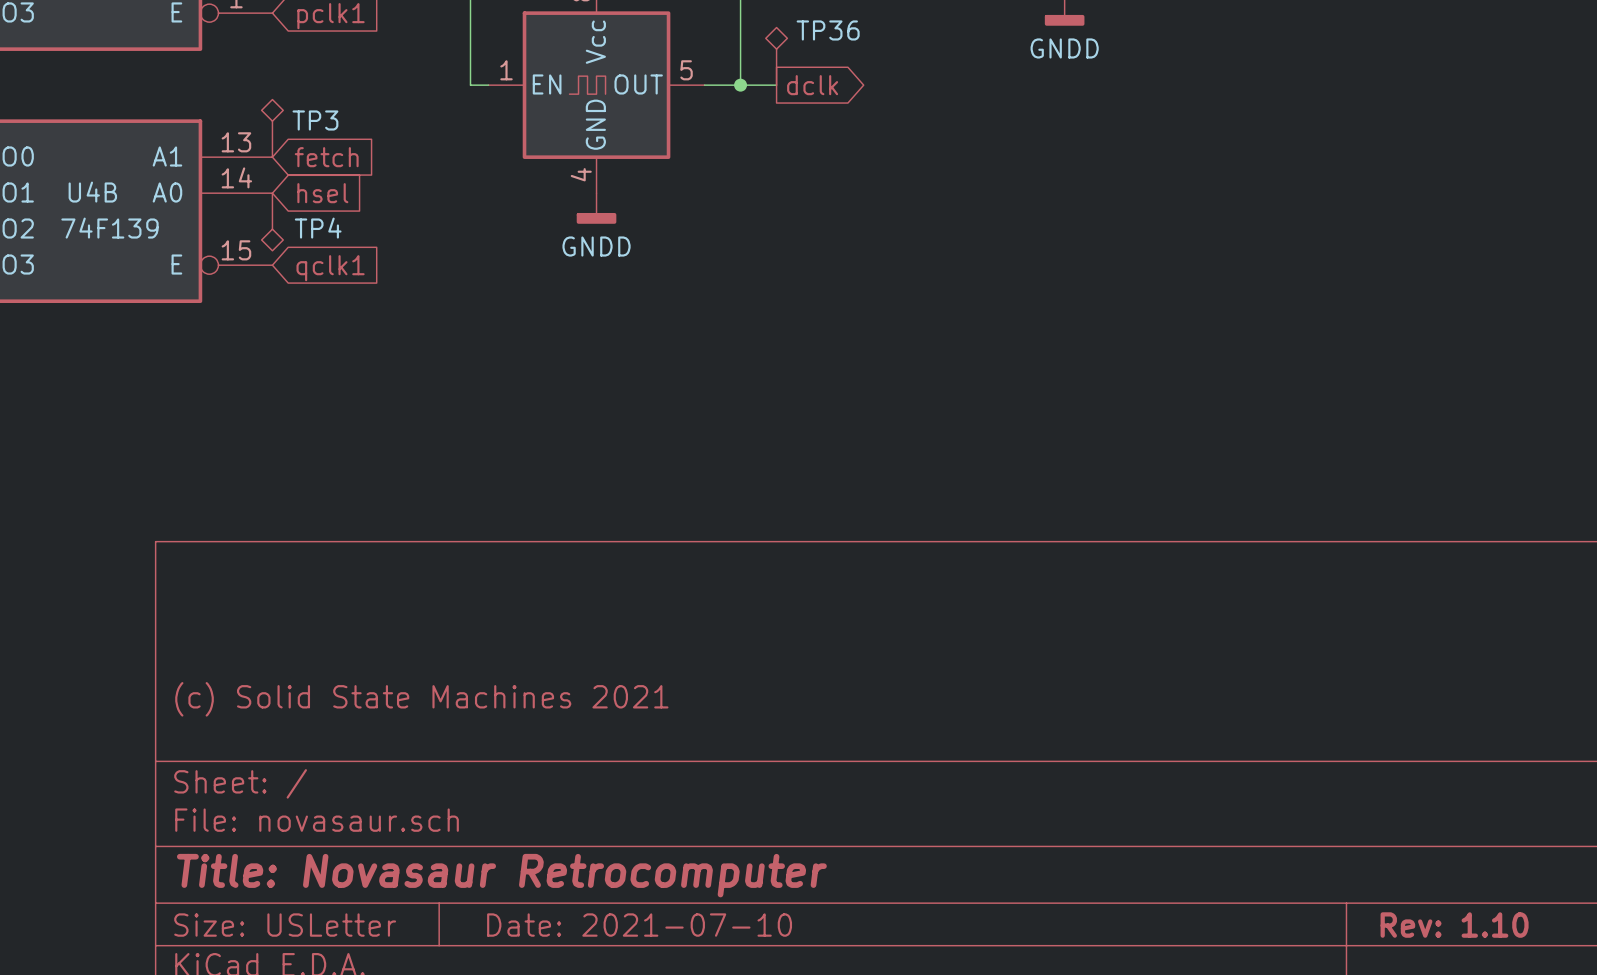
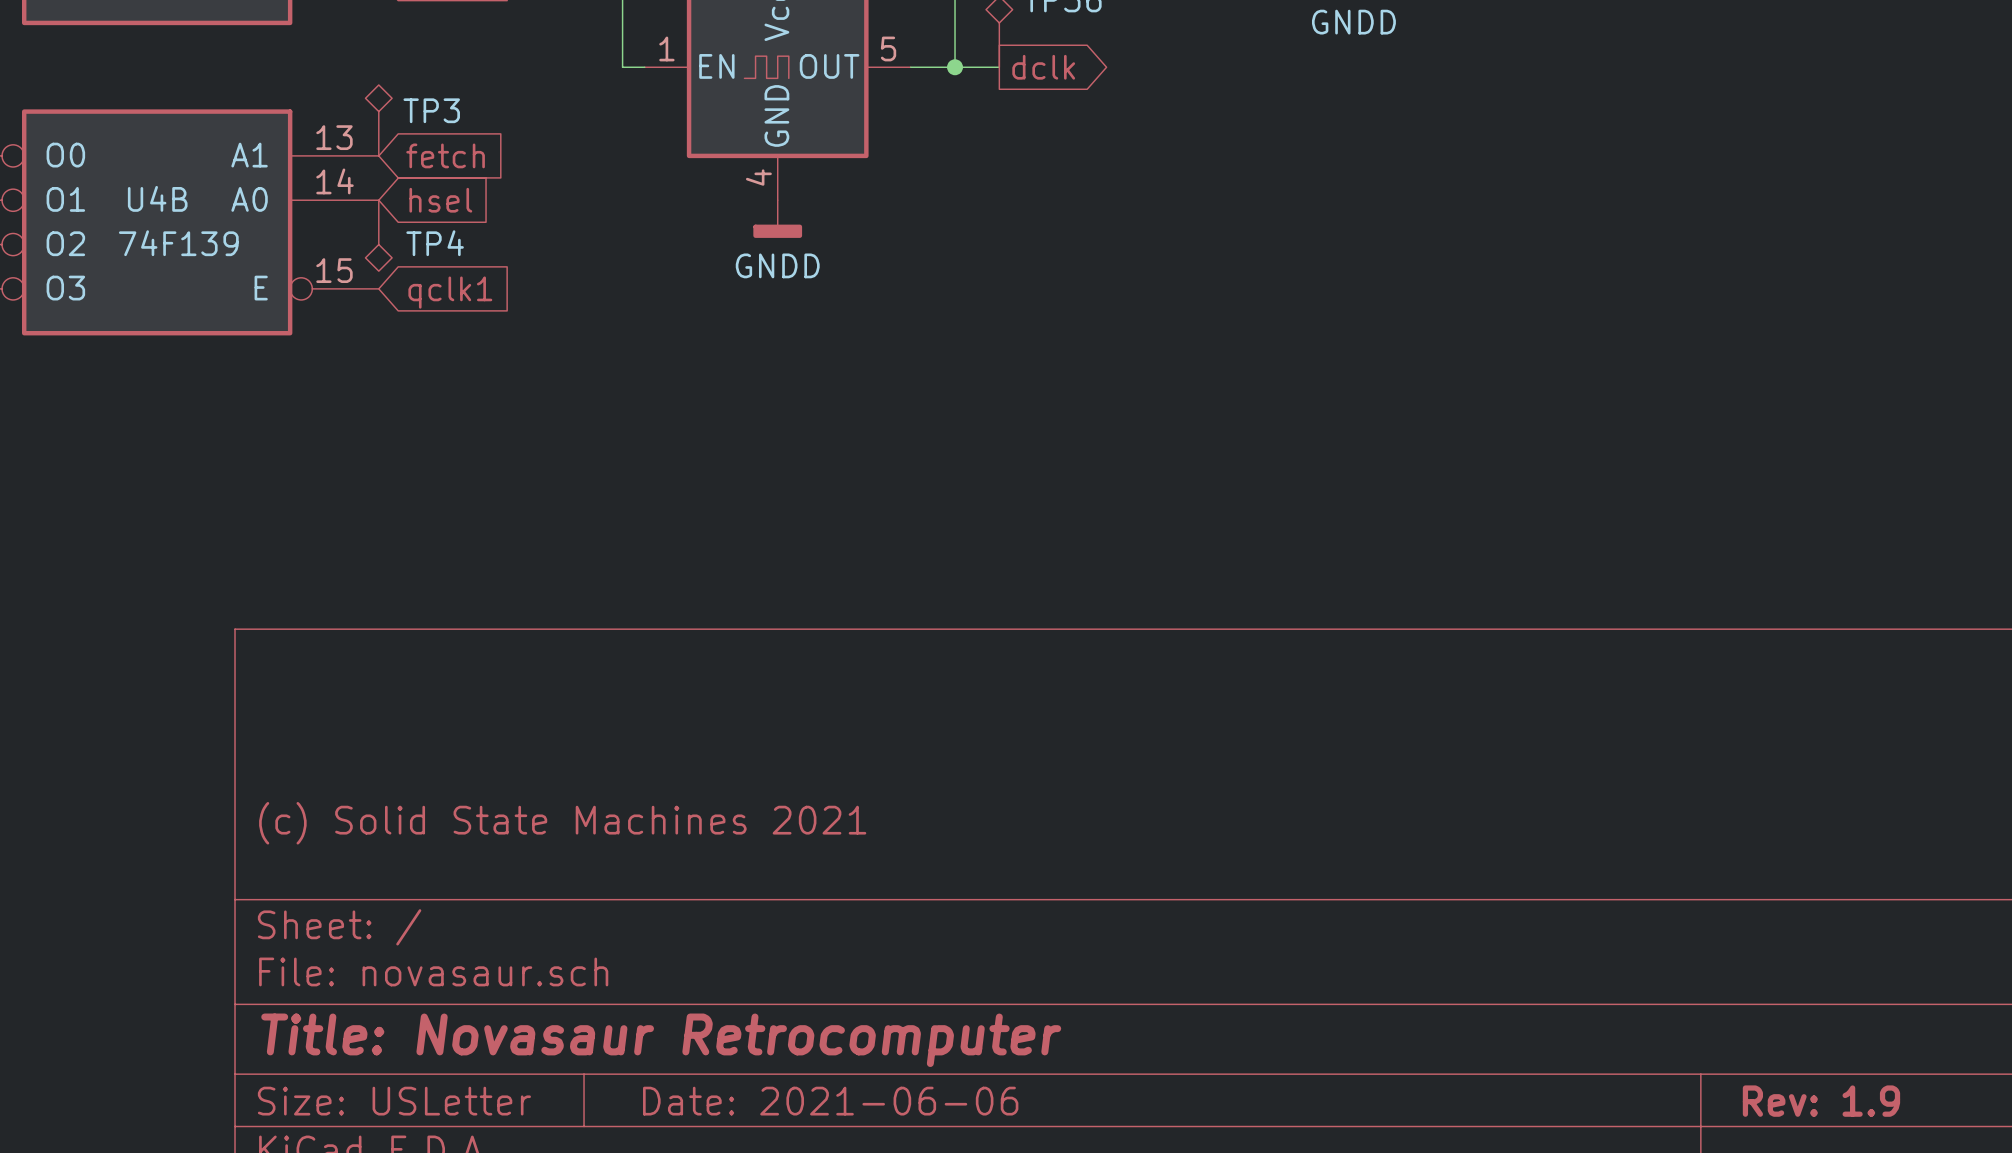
title block: Date: 2021-07-10 (639, 925) -> Date: 2021-06-06 (830, 1101)
title block: Rev: 1.10 (1454, 925) -> Rev: 1.9 (1821, 1101)

